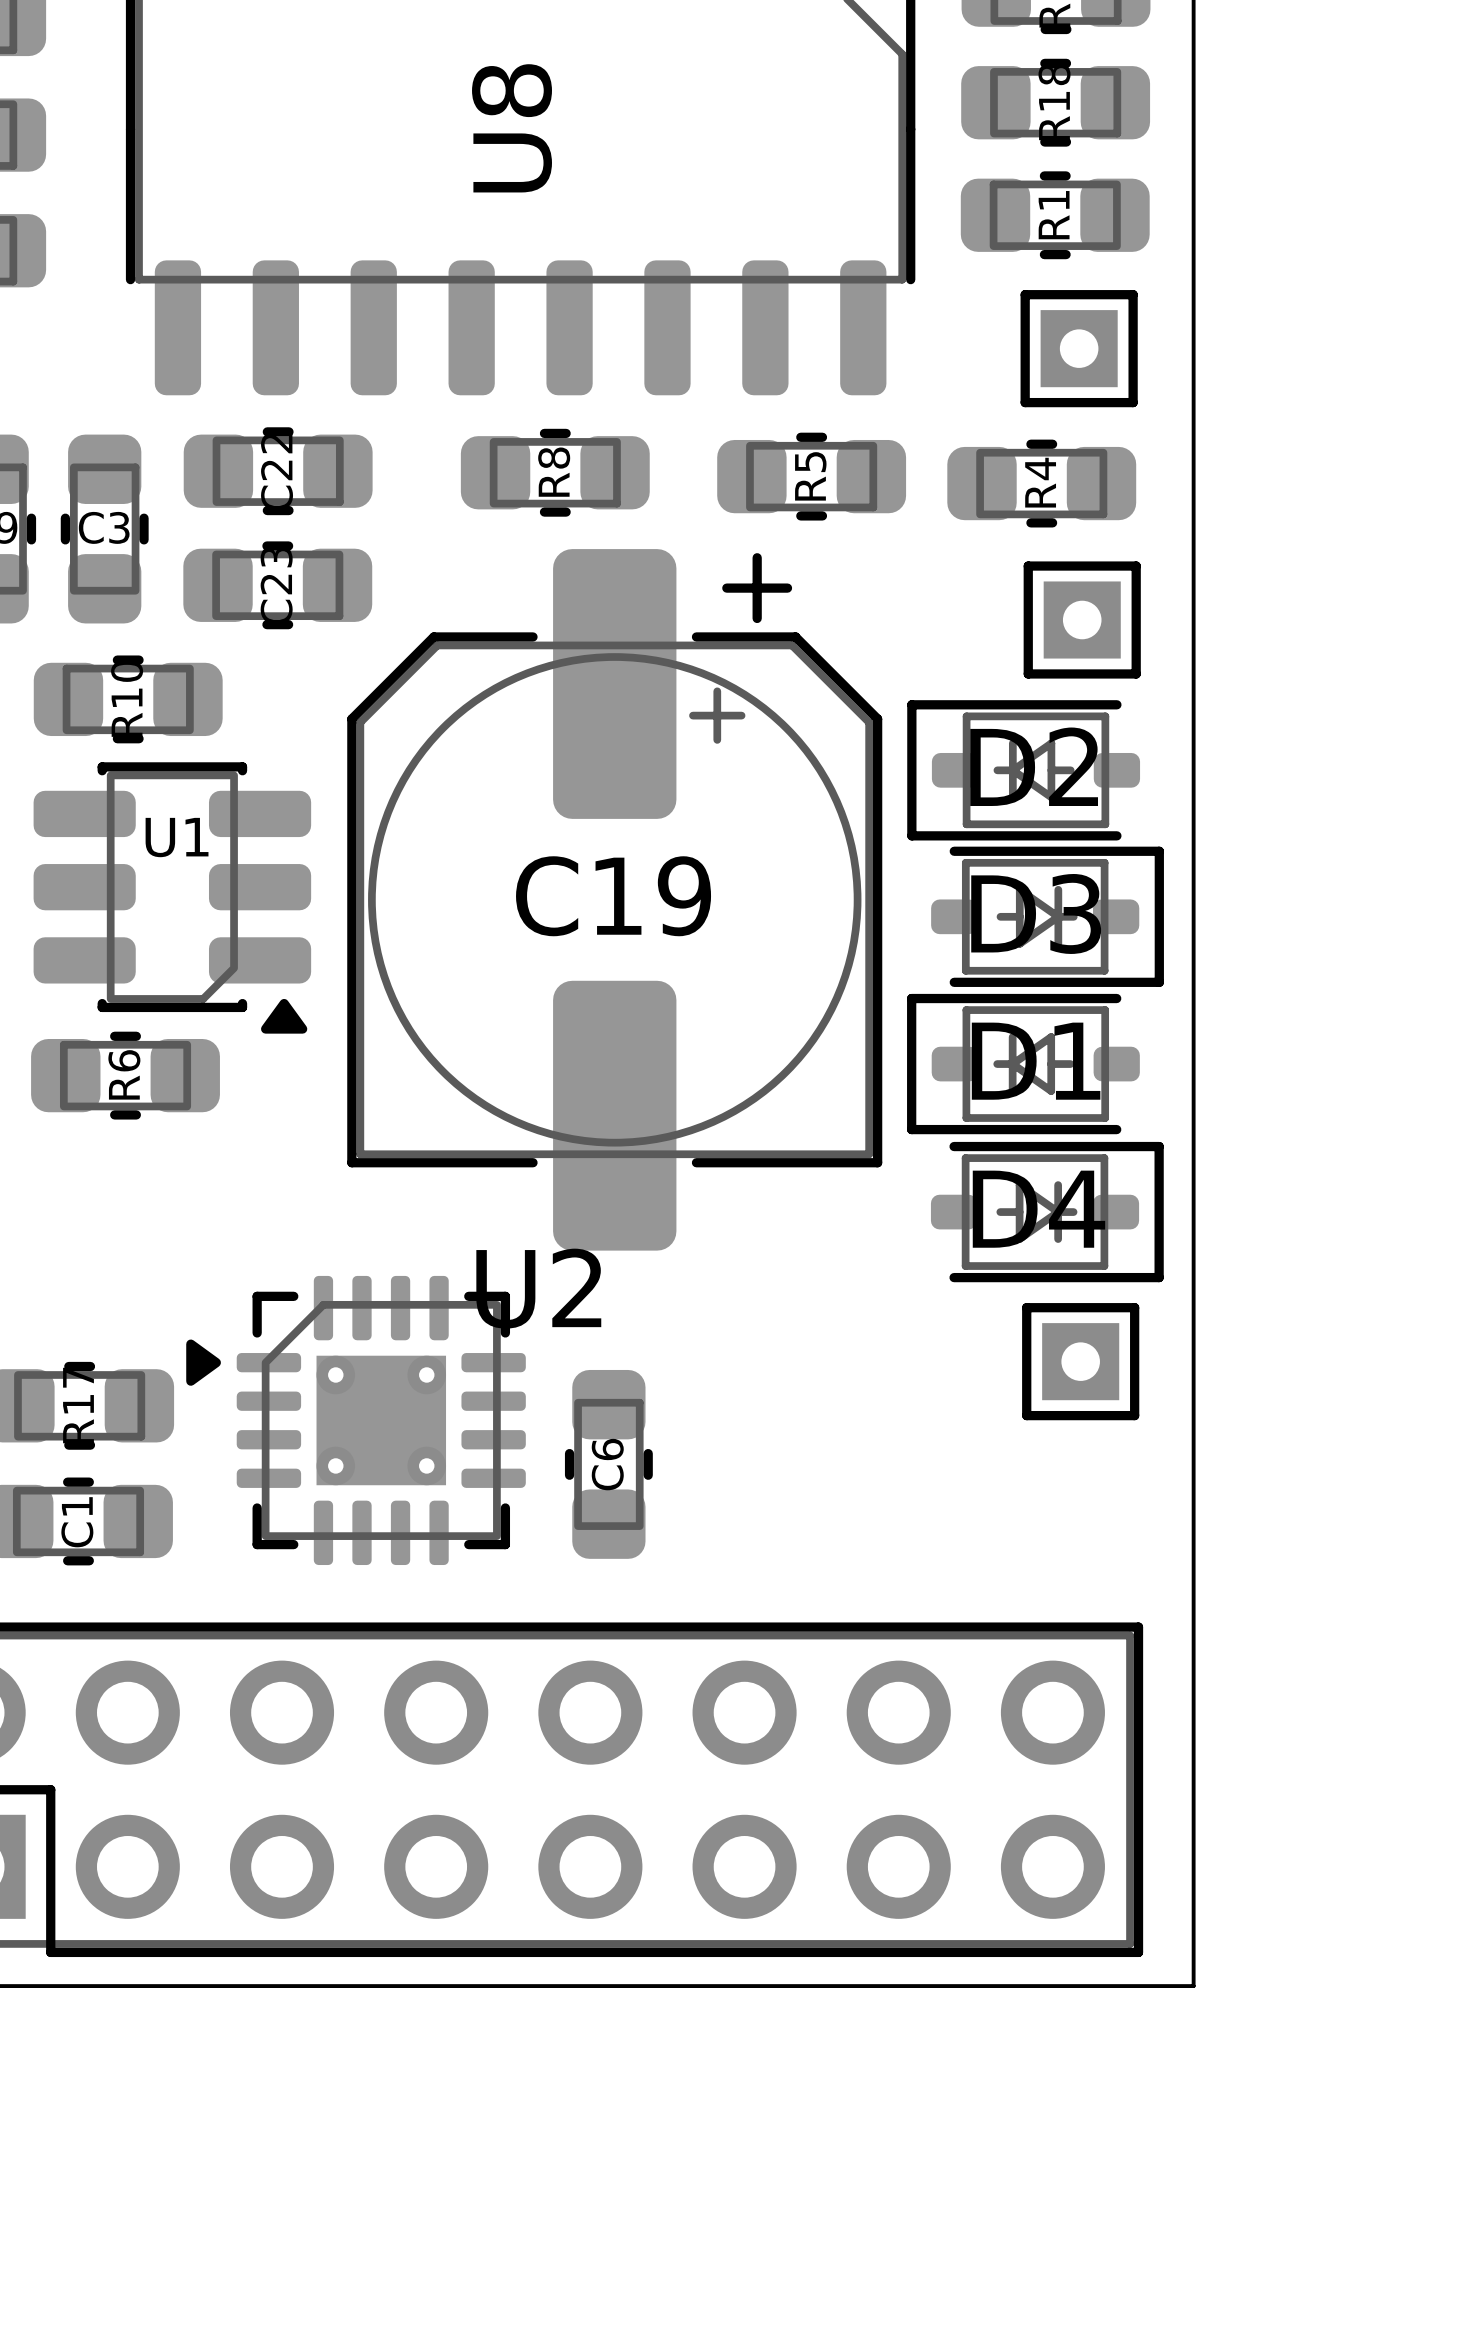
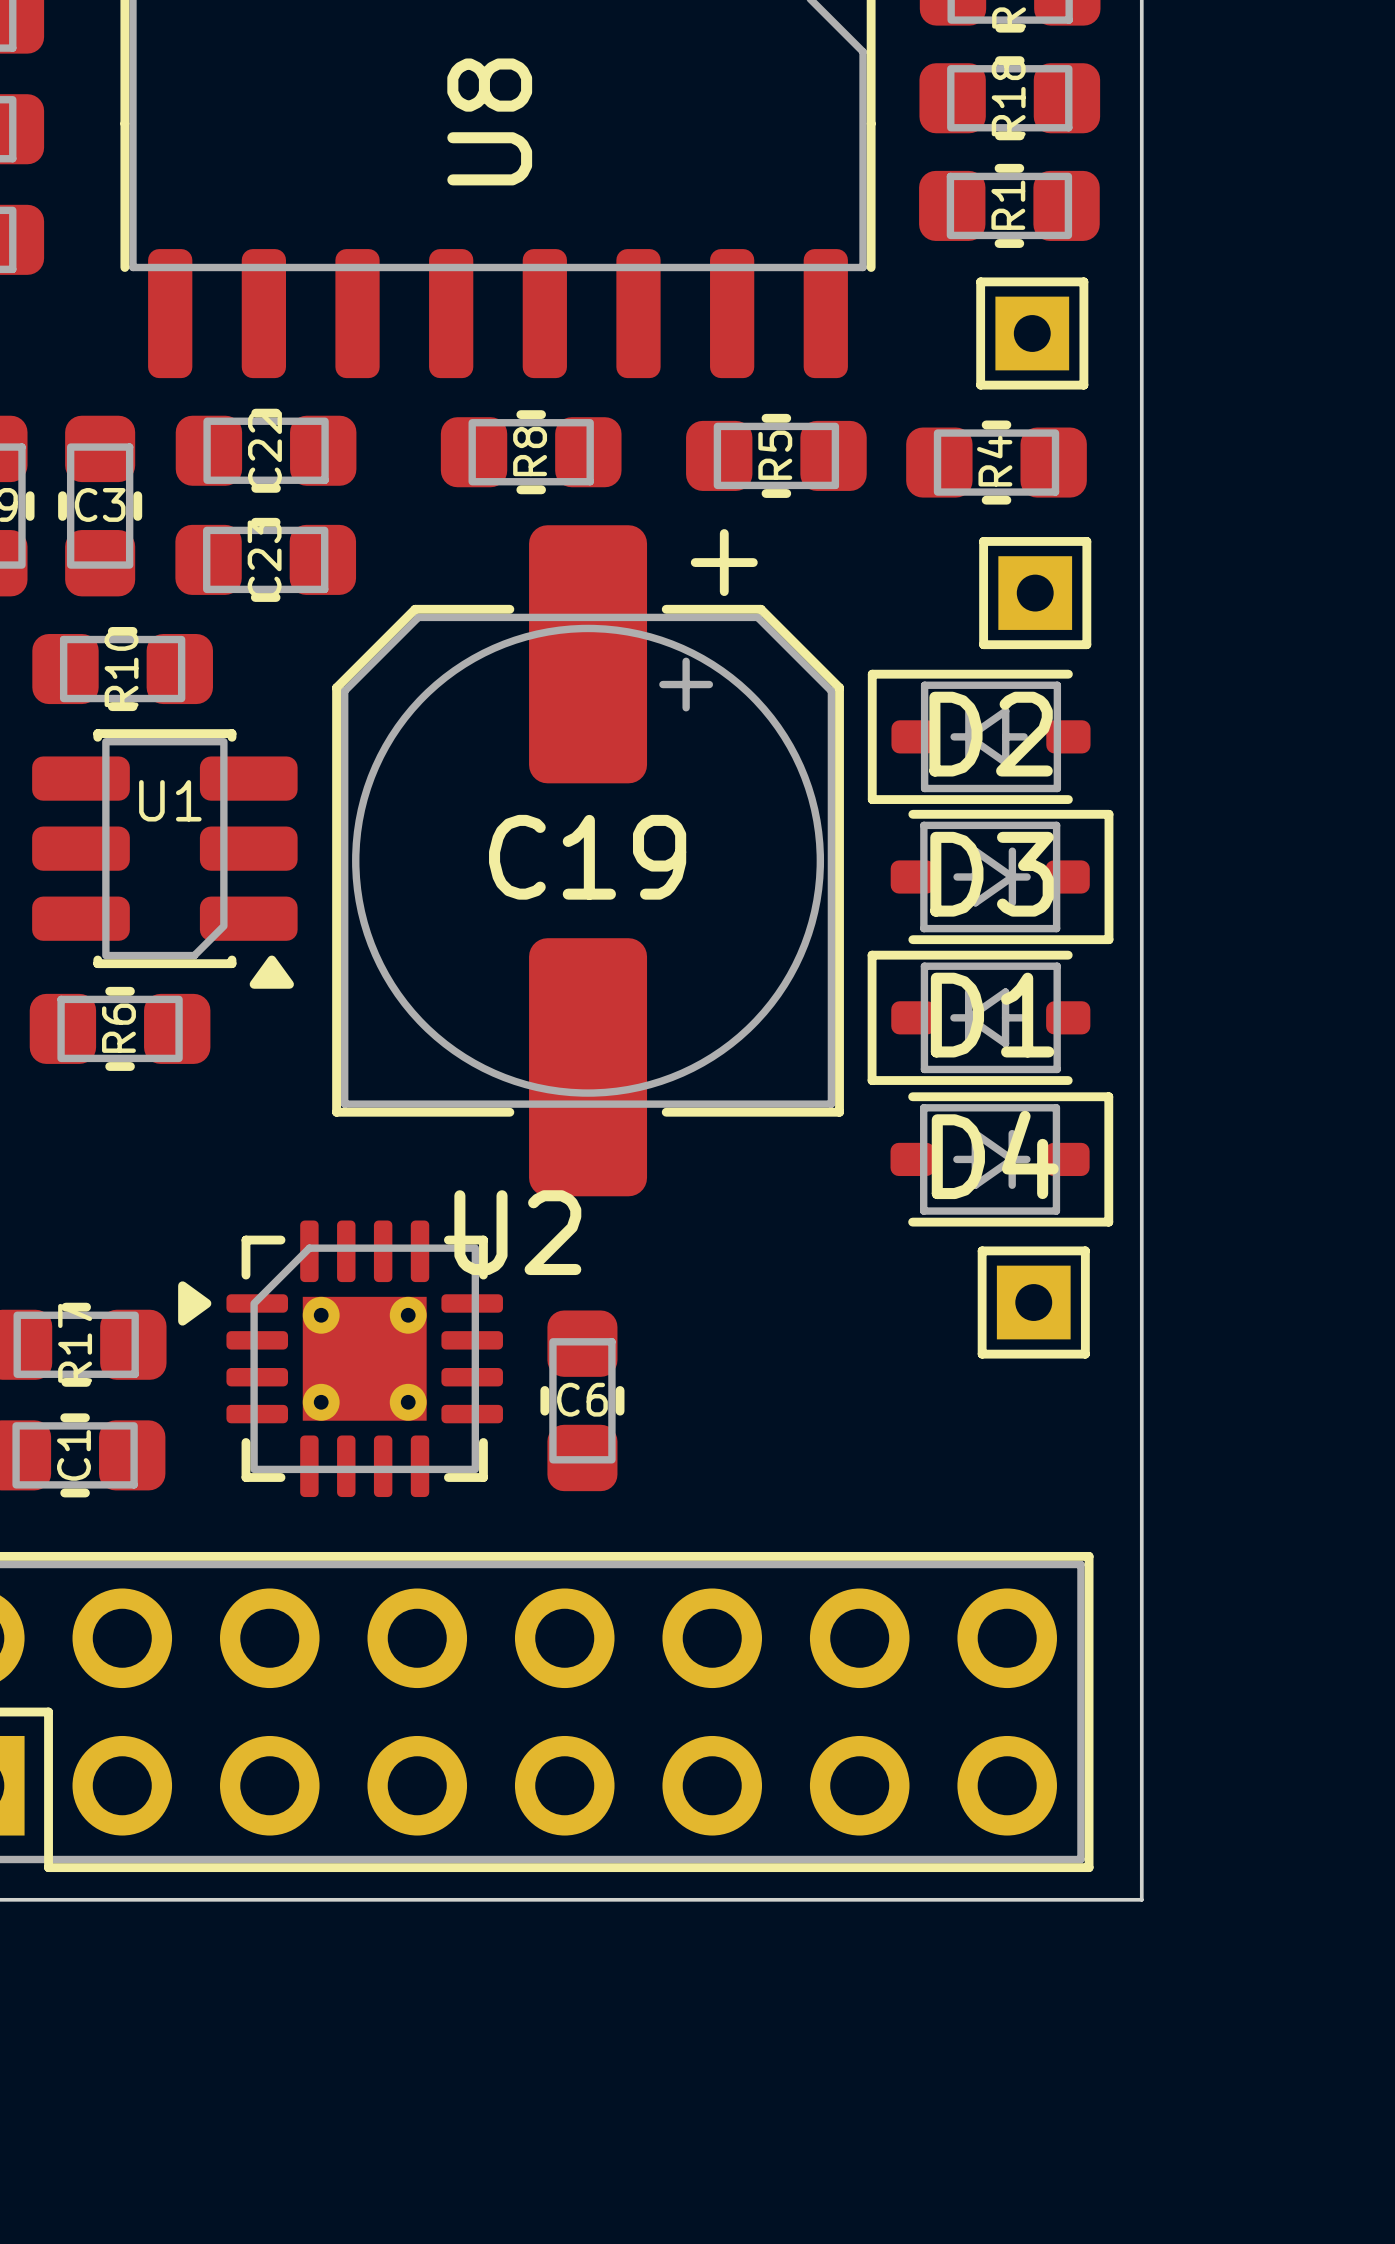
C6 name rotation: 0° (607, 1464) -> 90° clockwise (582, 1399)

